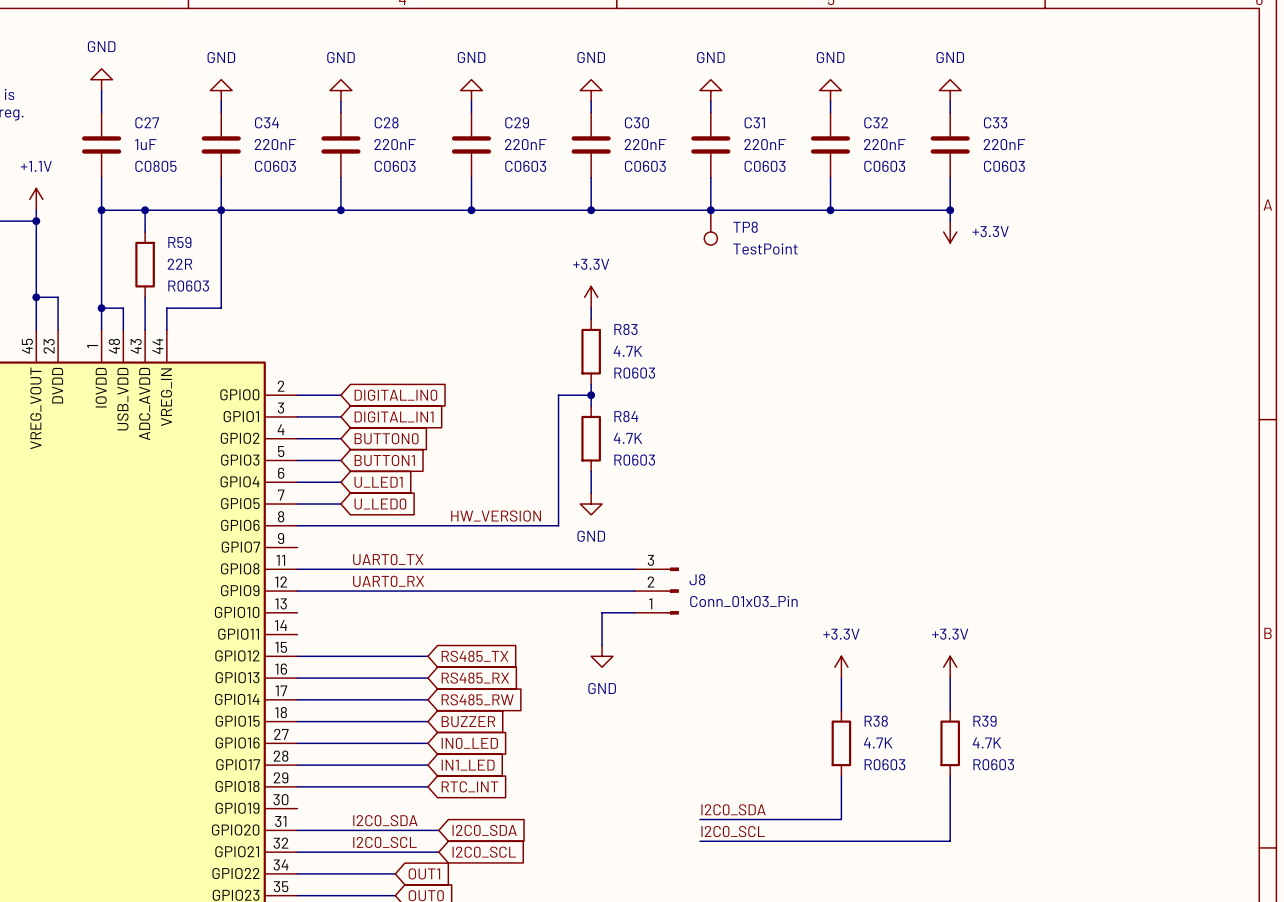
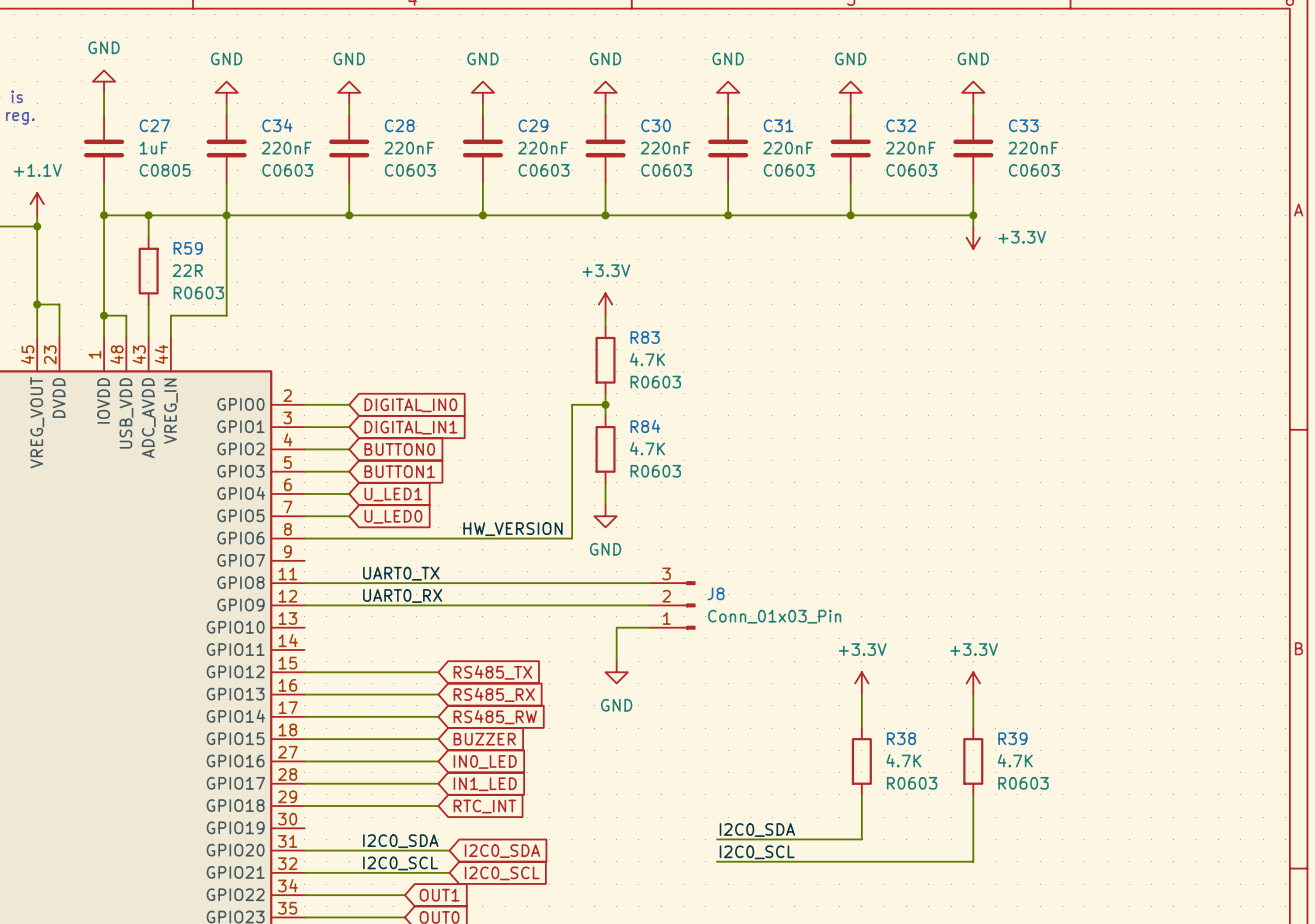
TP8: TestPoint (710, 227) -> none

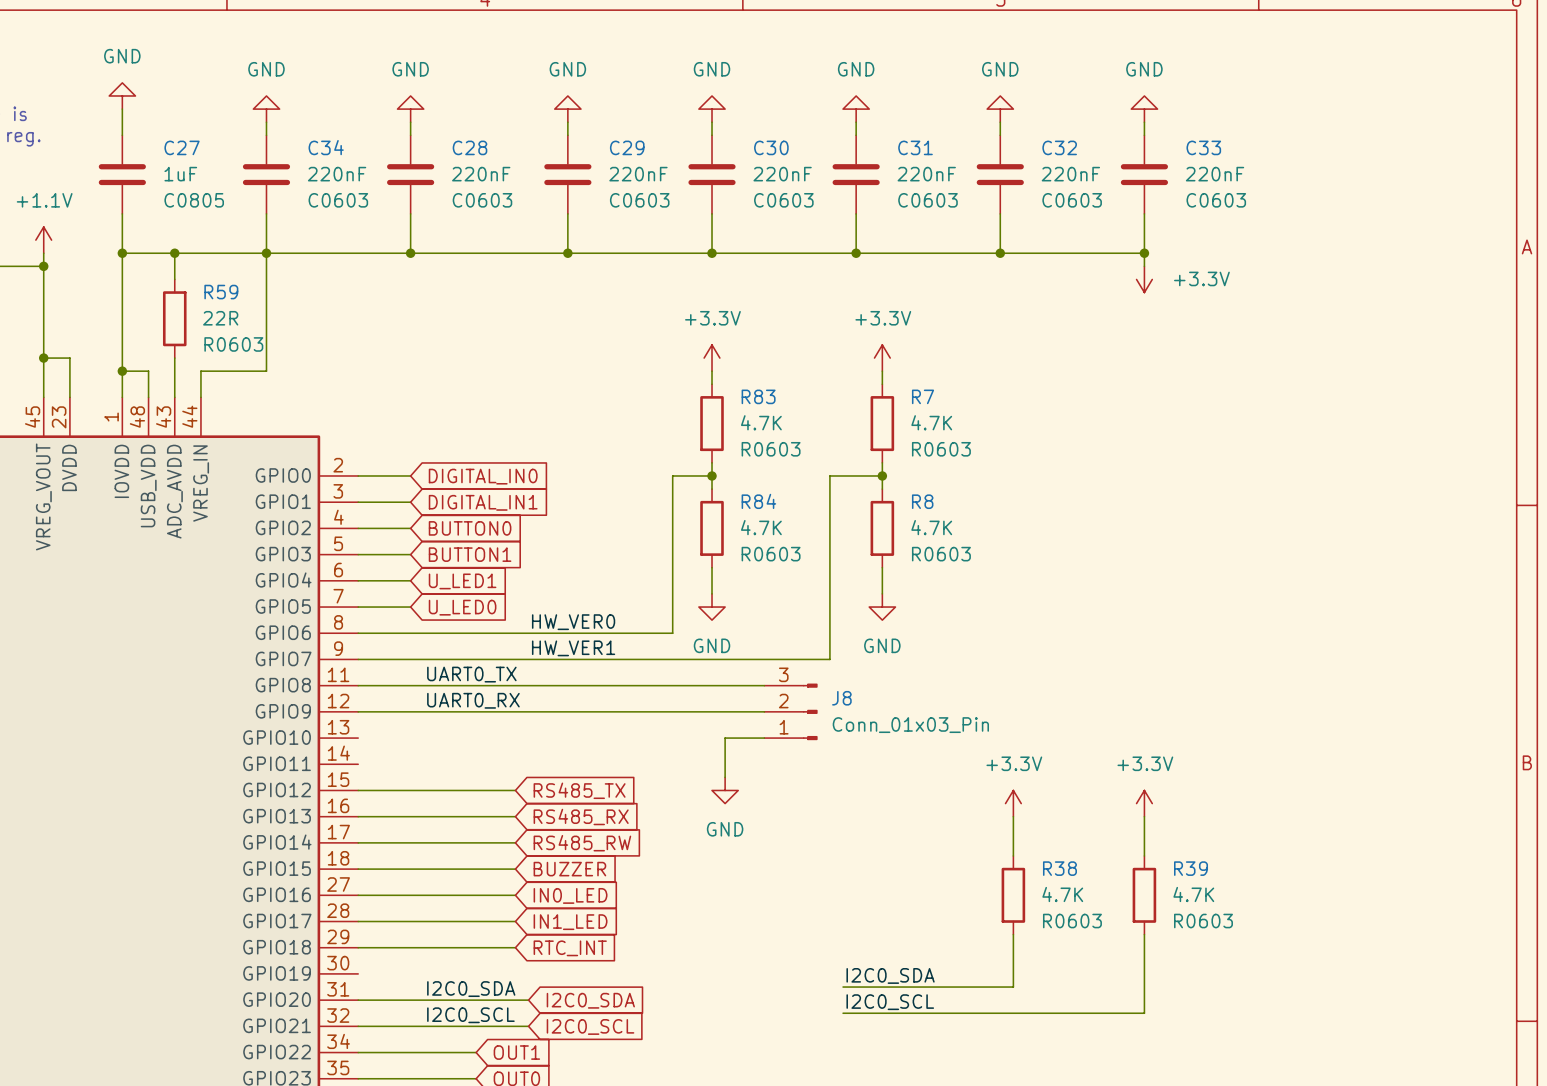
power symbol: none -> +3.3V (882, 358)
wire: none -> (882, 371) (882, 384)
R7: none -> 4.7K (882, 423)
wire: none -> (882, 462) (882, 489)
wire: none -> (882, 475) (829, 475) (829, 659) (358, 659)
junction: none -> (882, 475)
R8: none -> 4.7K (882, 528)
wire: none -> (882, 567) (882, 593)
power symbol: none -> GND (882, 607)
label: HW_VERSION (513, 529) -> HW_VER0 (573, 622)
label: none -> HW_VER1 (573, 648)

